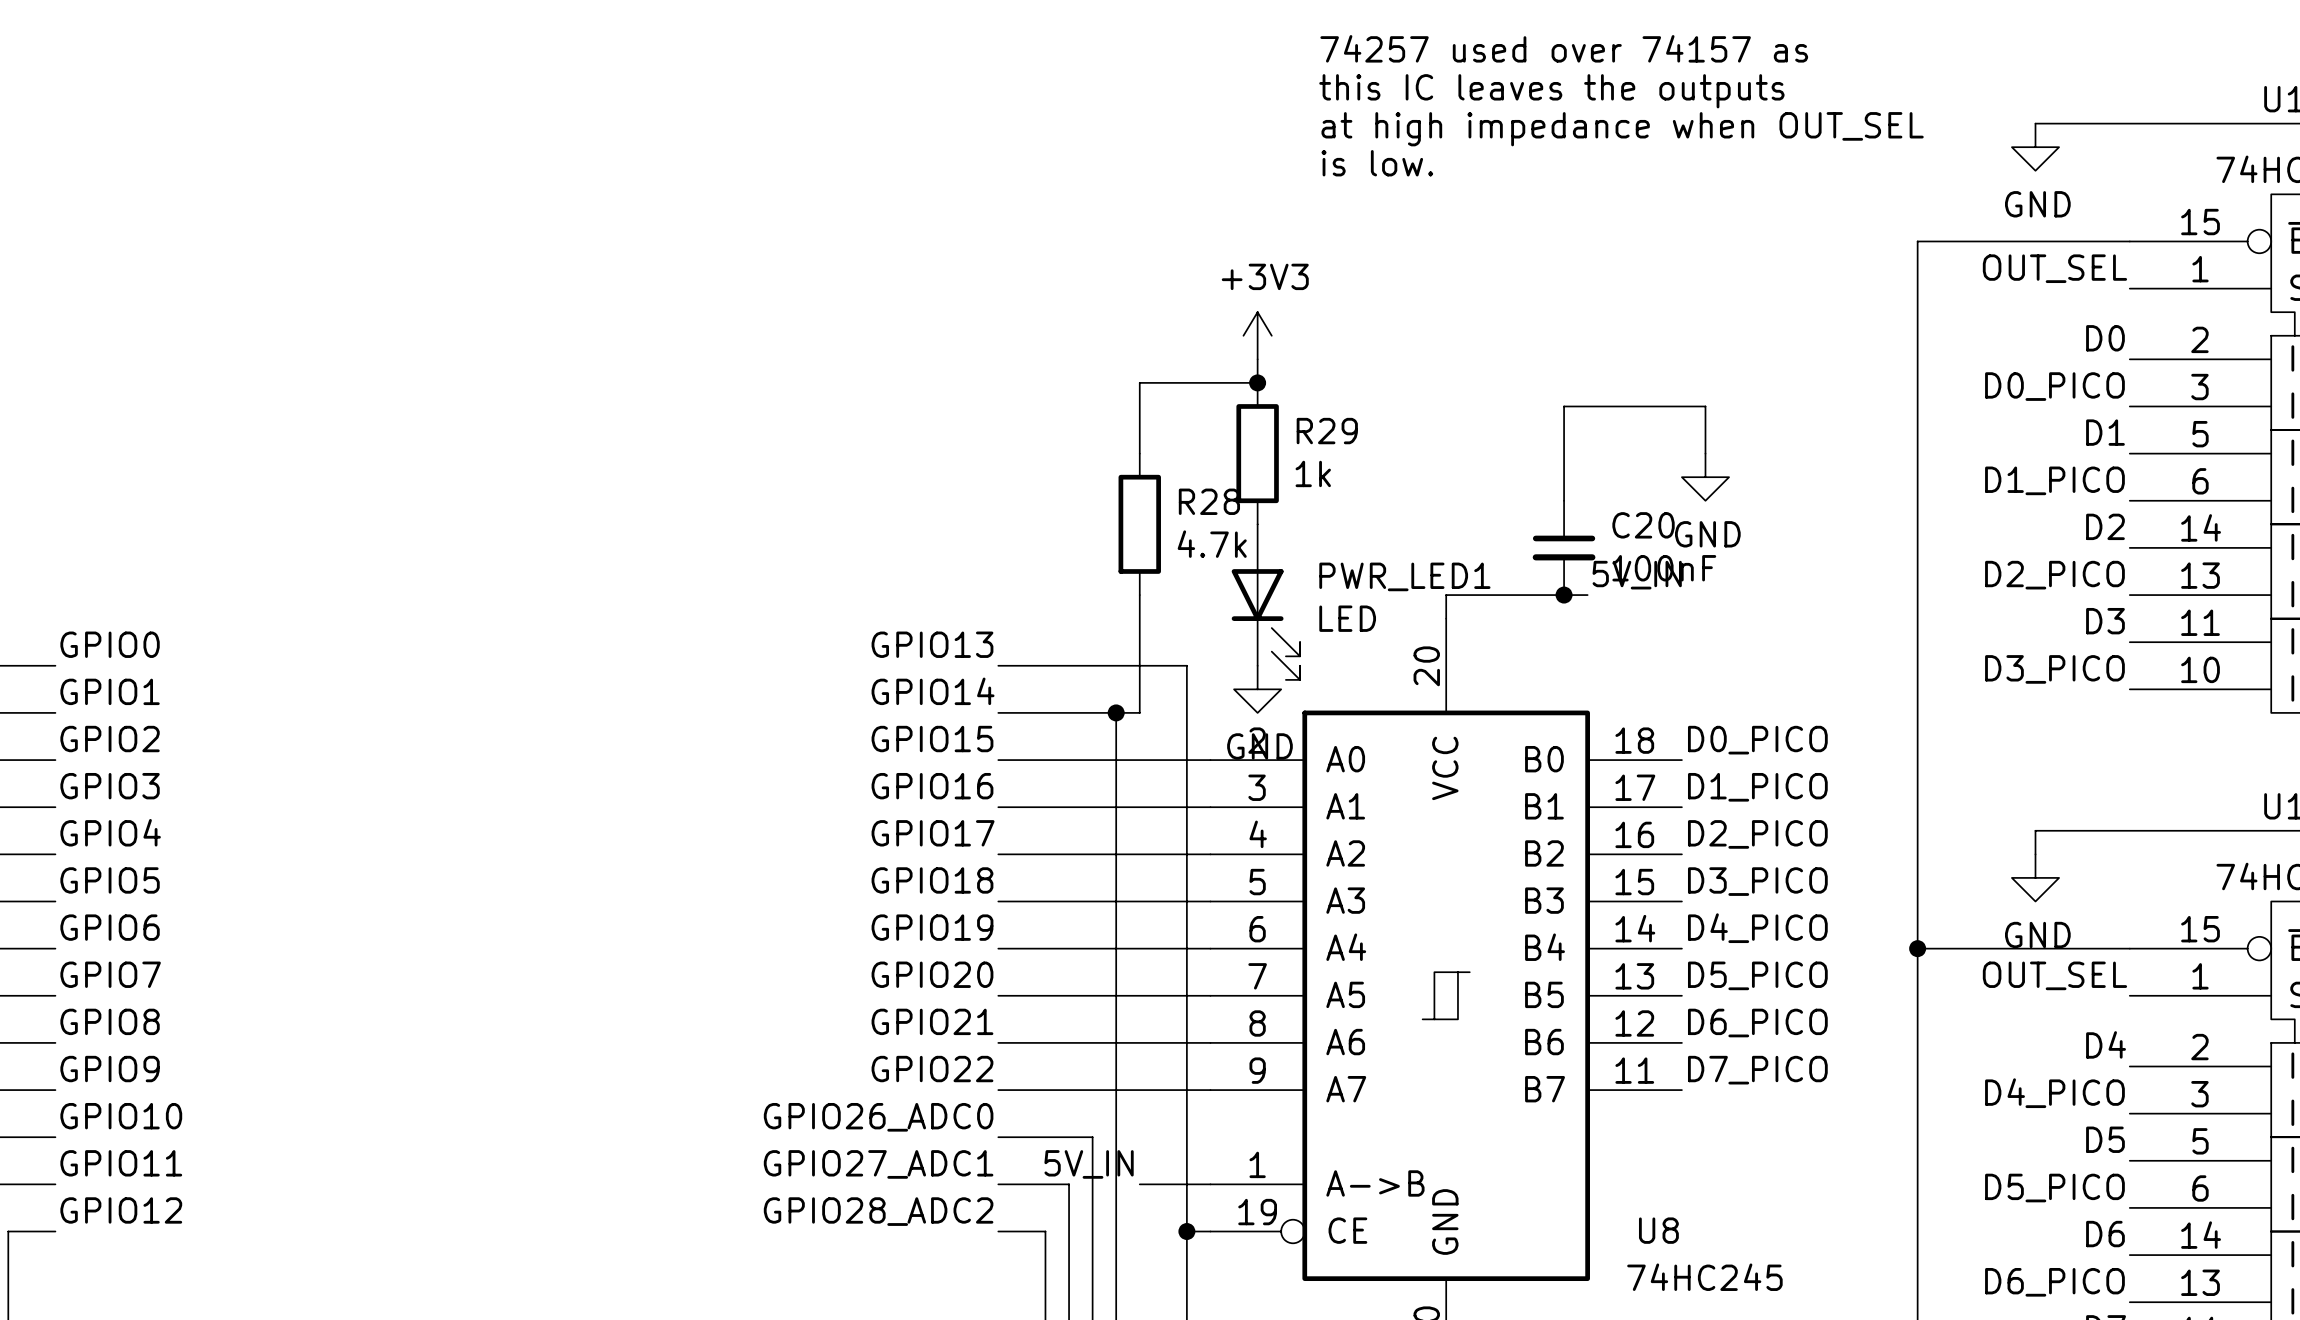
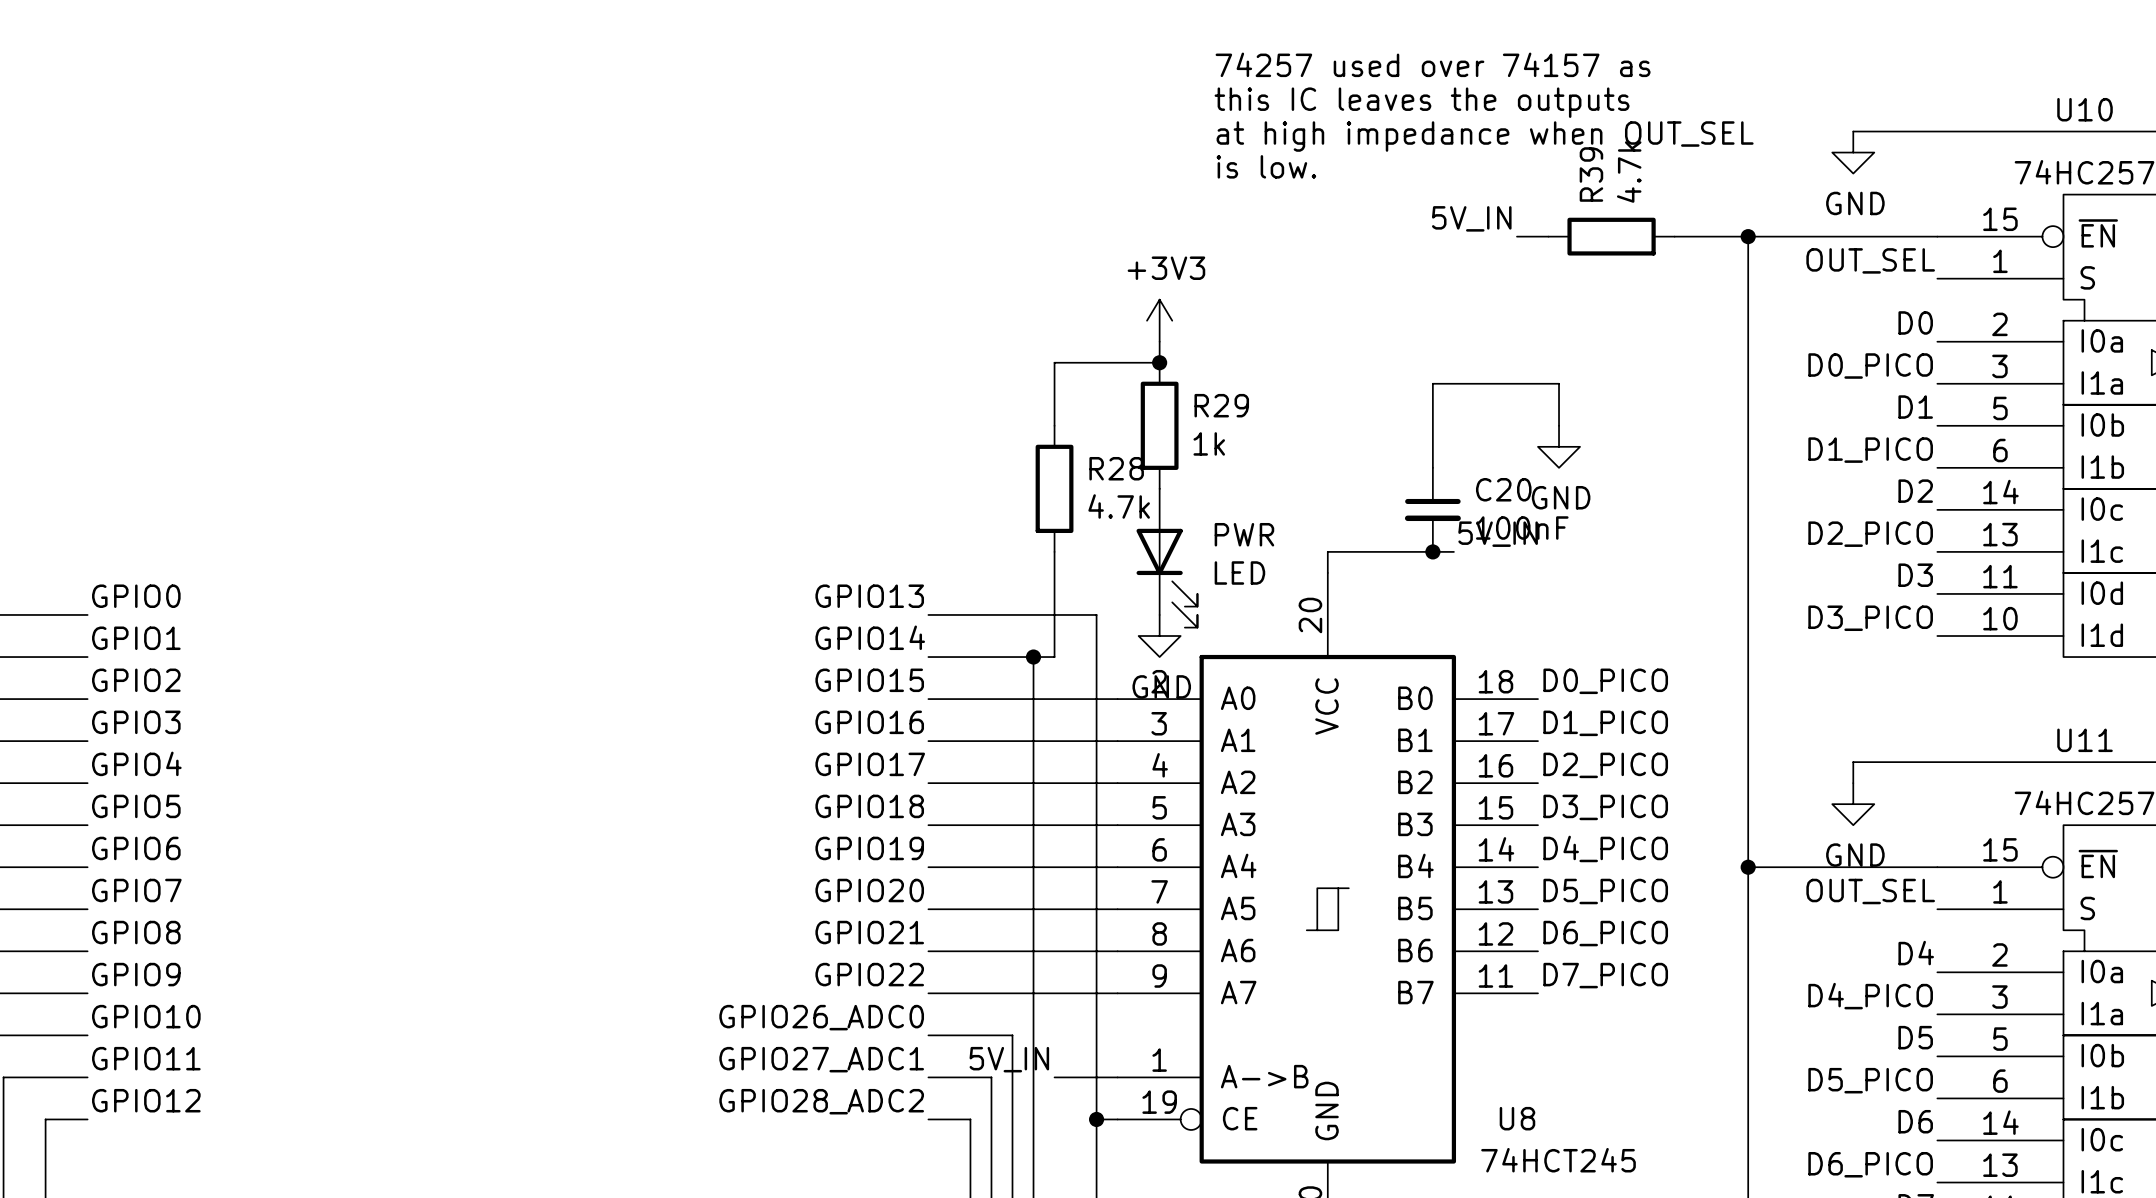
label: none -> 5V_IN (1471, 218)
wire: none -> (1516, 236) (1548, 236)
R39: none -> 4.7k (1611, 236)
wire: none -> (1674, 236) (1748, 236)
junction: none -> (1748, 236)
PWR_LED1 name: PWR_LED1 (1404, 576) -> PWR (1244, 534)
U8 value: 74HC245 (1704, 1277) -> 74HCT245 (1558, 1160)

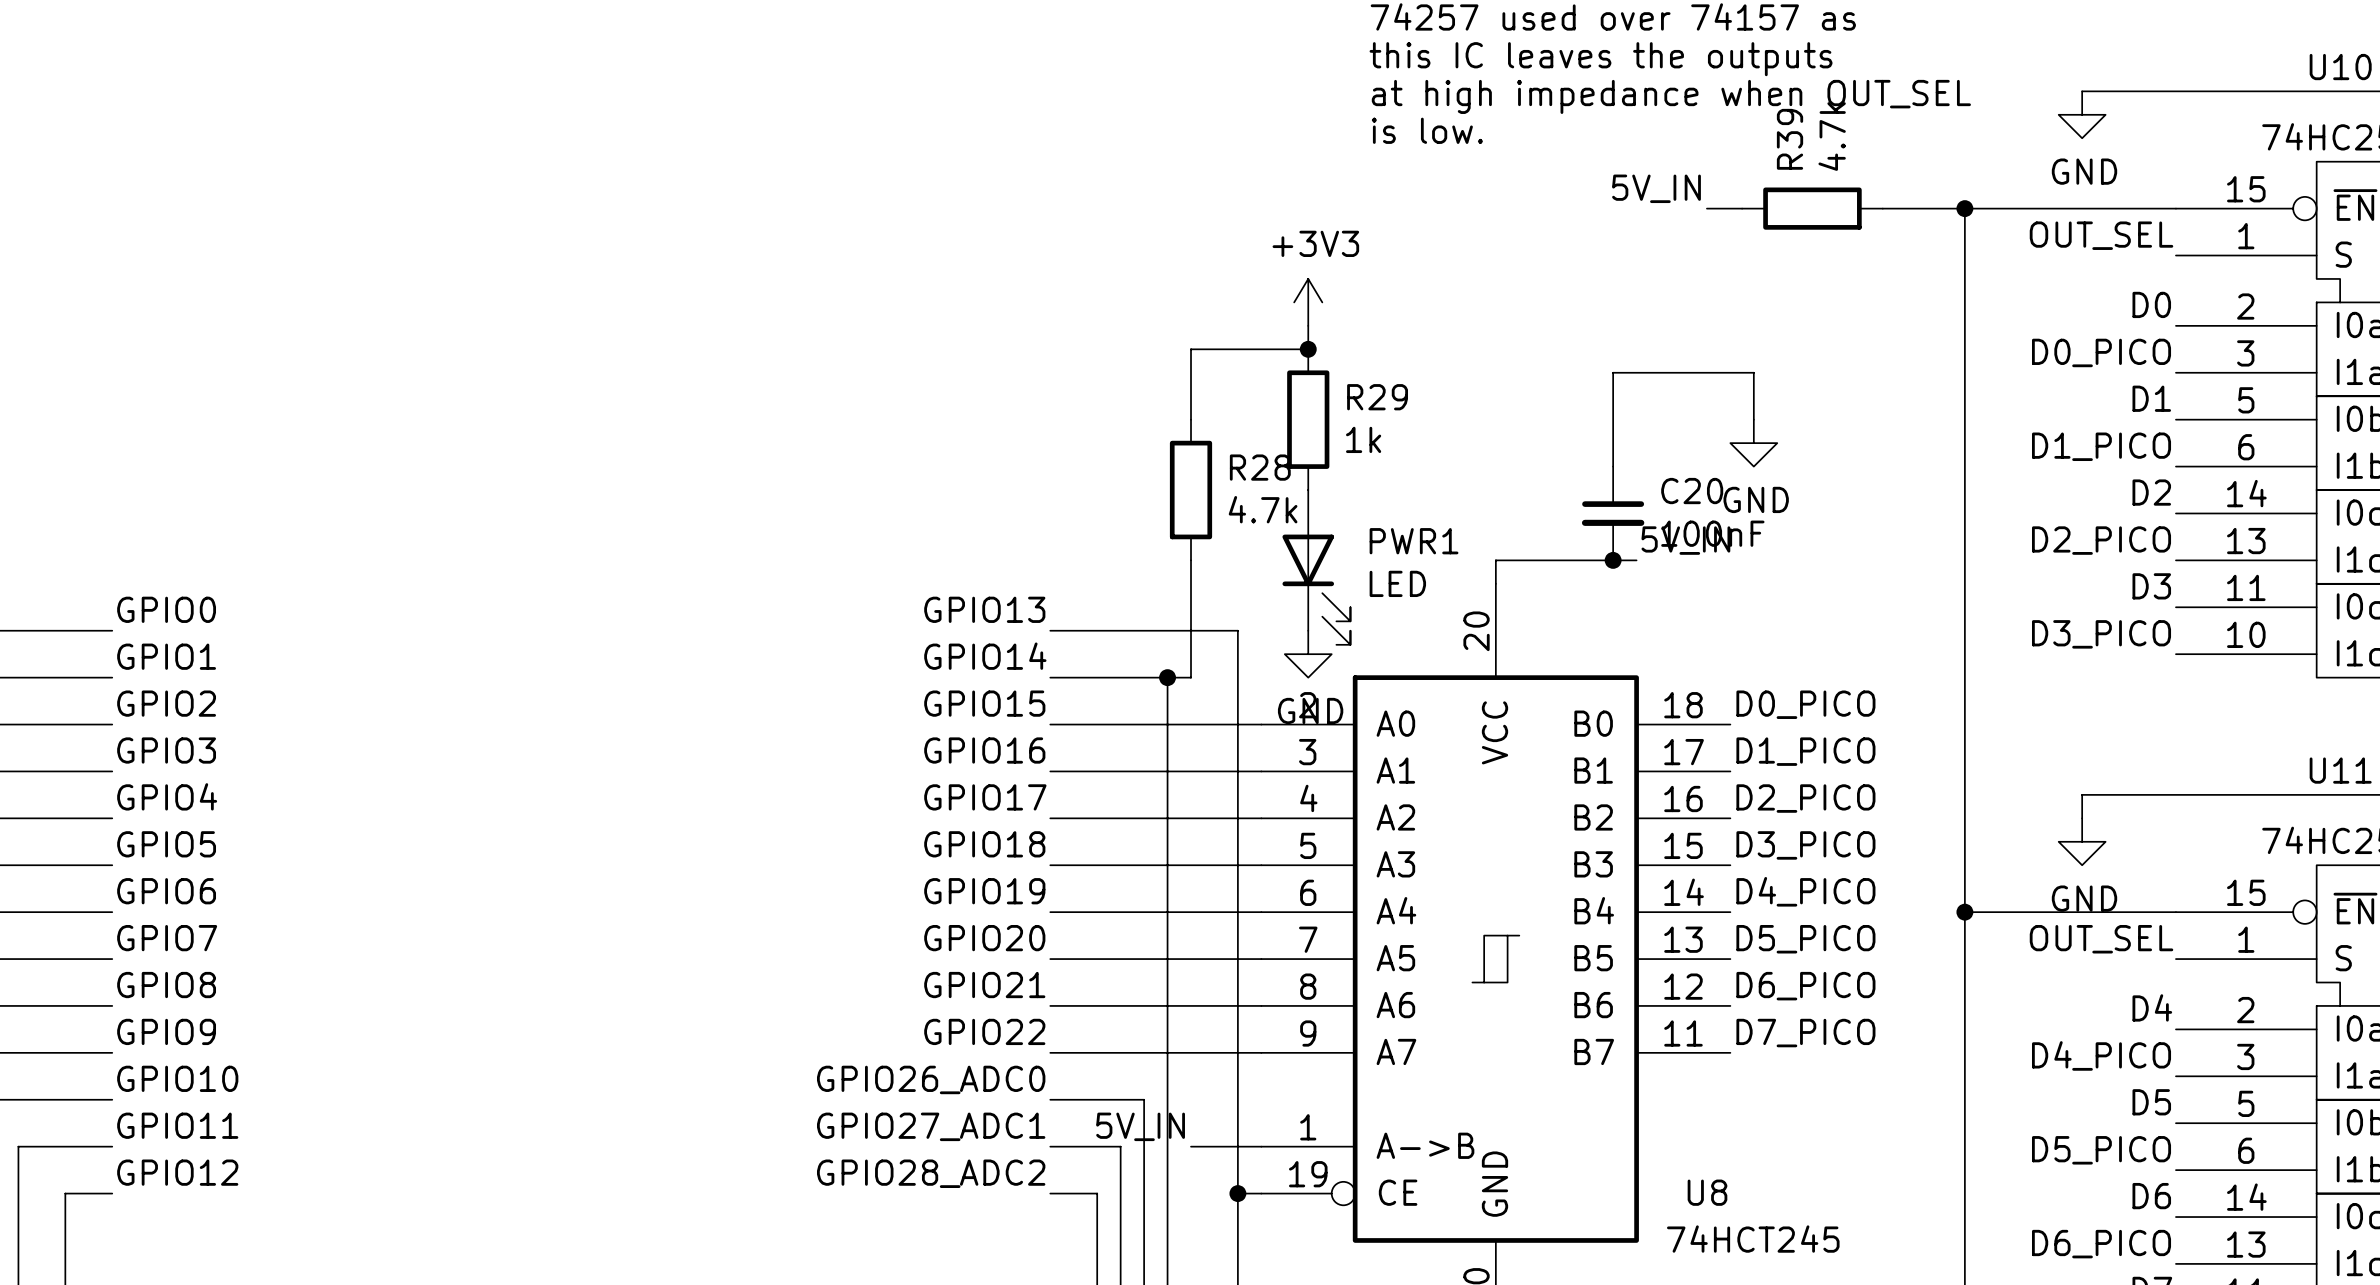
PWR name: PWR (1244, 534) -> PWR1 (1414, 541)

